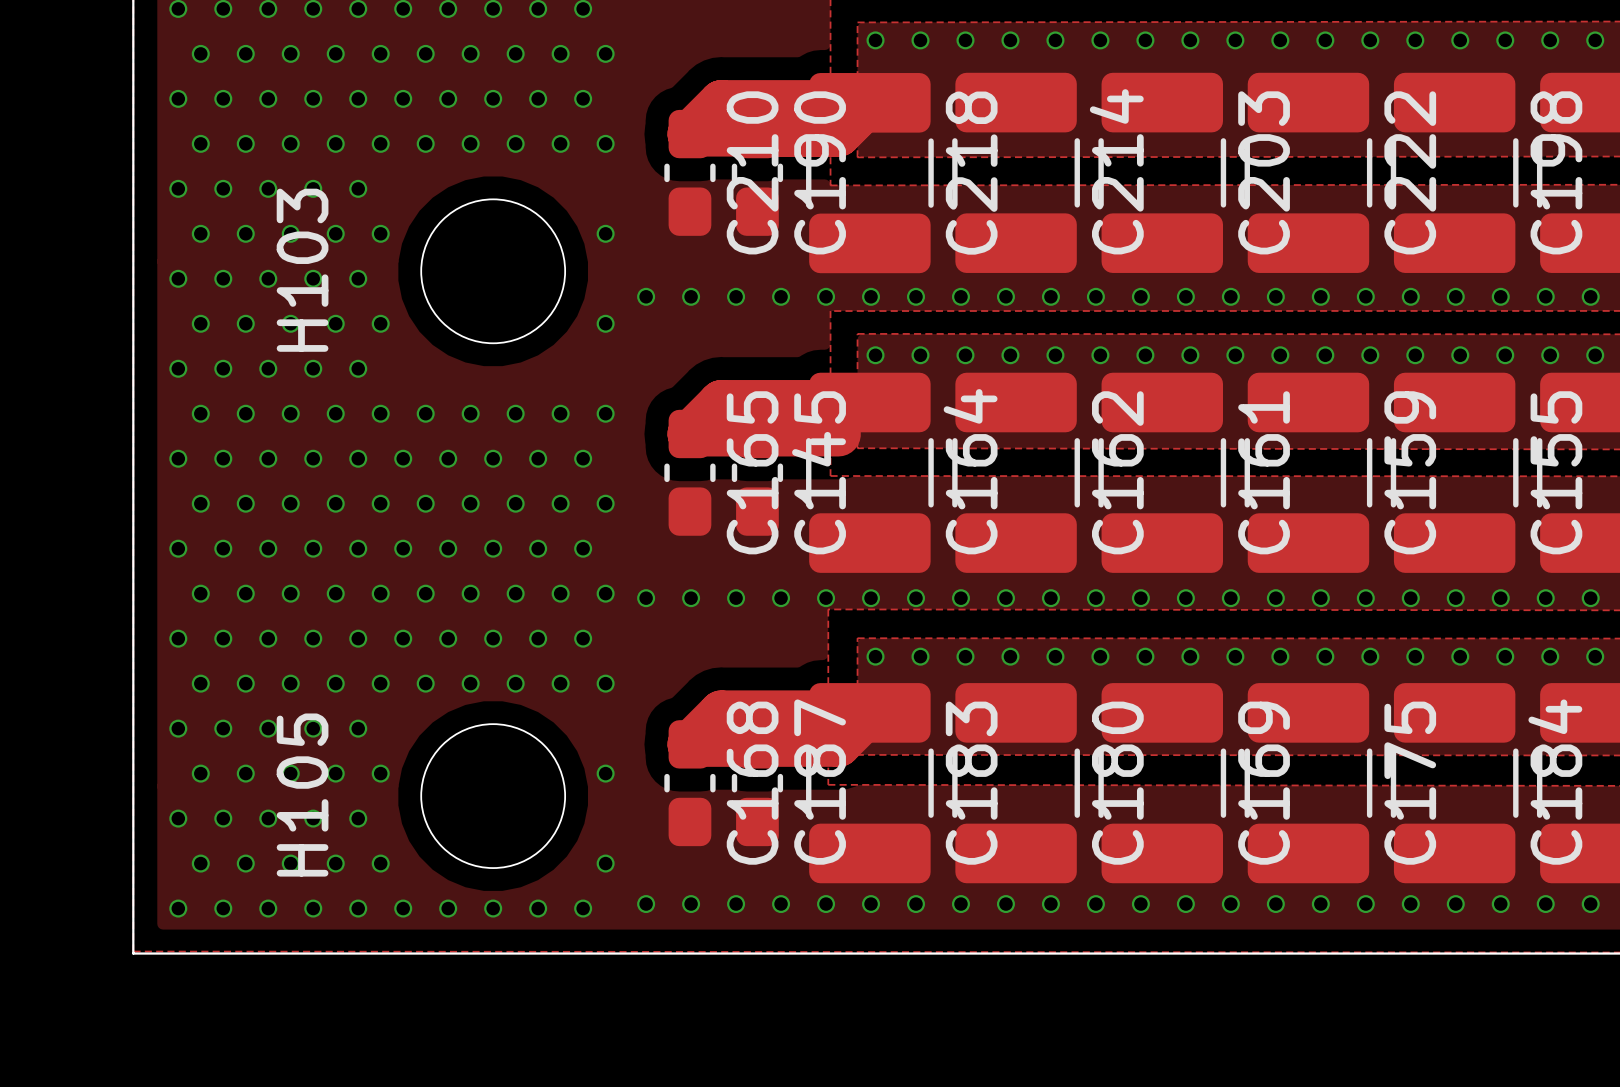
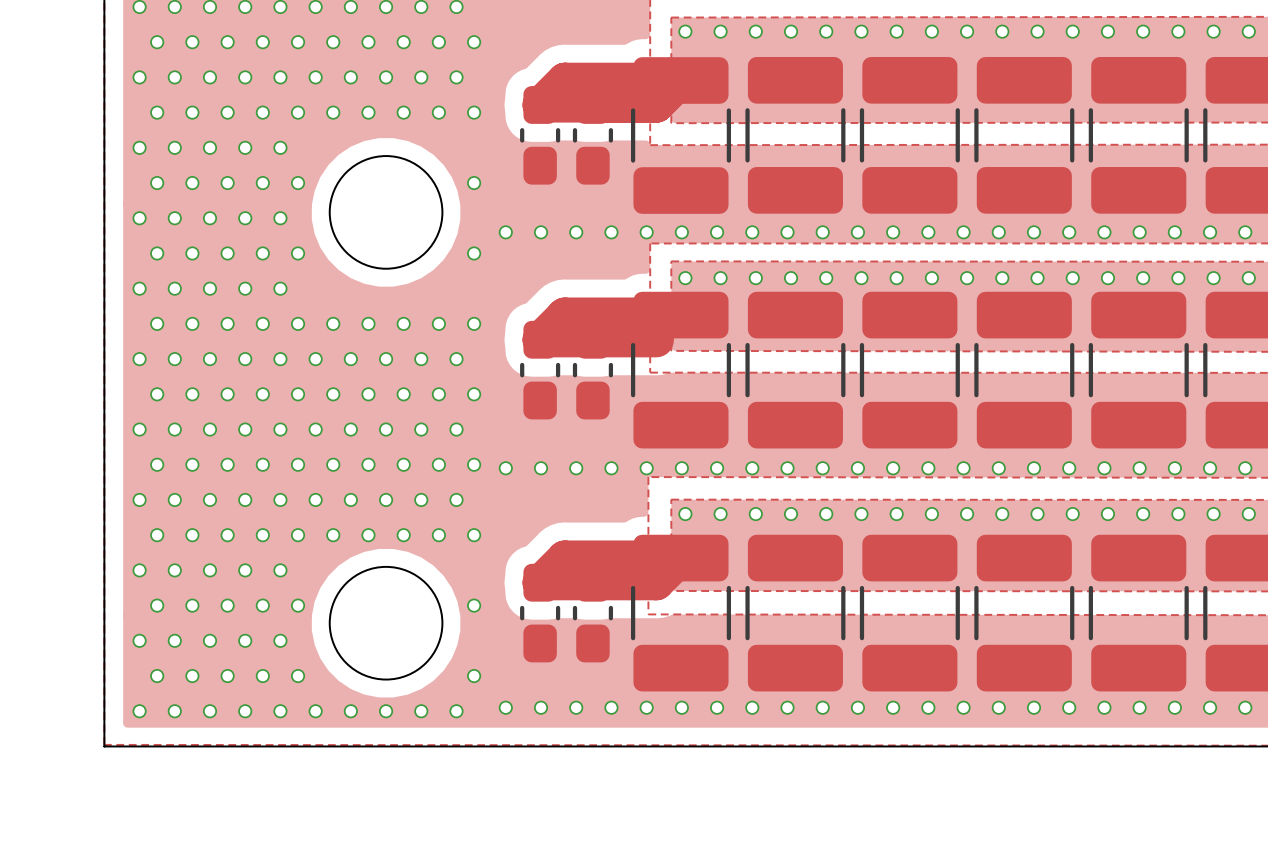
C214 name: C214 (1116, 171) -> none
C210 name: C210 (752, 172) -> none
C190 name: C190 (820, 172) -> none
C203 name: C203 (1264, 172) -> none
C222 name: C222 (1410, 172) -> none
C198 name: C198 (1556, 172) -> none
C218 name: C218 (971, 173) -> none
H103 name: H103 (302, 270) -> none
C164 name: C164 (970, 471) -> none
C165 name: C165 (752, 472) -> none
C145 name: C145 (819, 472) -> none
C162 name: C162 (1117, 472) -> none
C161 name: C161 (1264, 472) -> none
C159 name: C159 (1410, 472) -> none
C155 name: C155 (1556, 472) -> none
C187 name: C187 (820, 782) -> none
C184 name: C184 (1555, 782) -> none
C168 name: C168 (752, 783) -> none
C183 name: C183 (971, 783) -> none
C180 name: C180 (1117, 783) -> none
C169 name: C169 (1264, 783) -> none
C175 name: C175 (1410, 783) -> none
H105 name: H105 (302, 795) -> none

